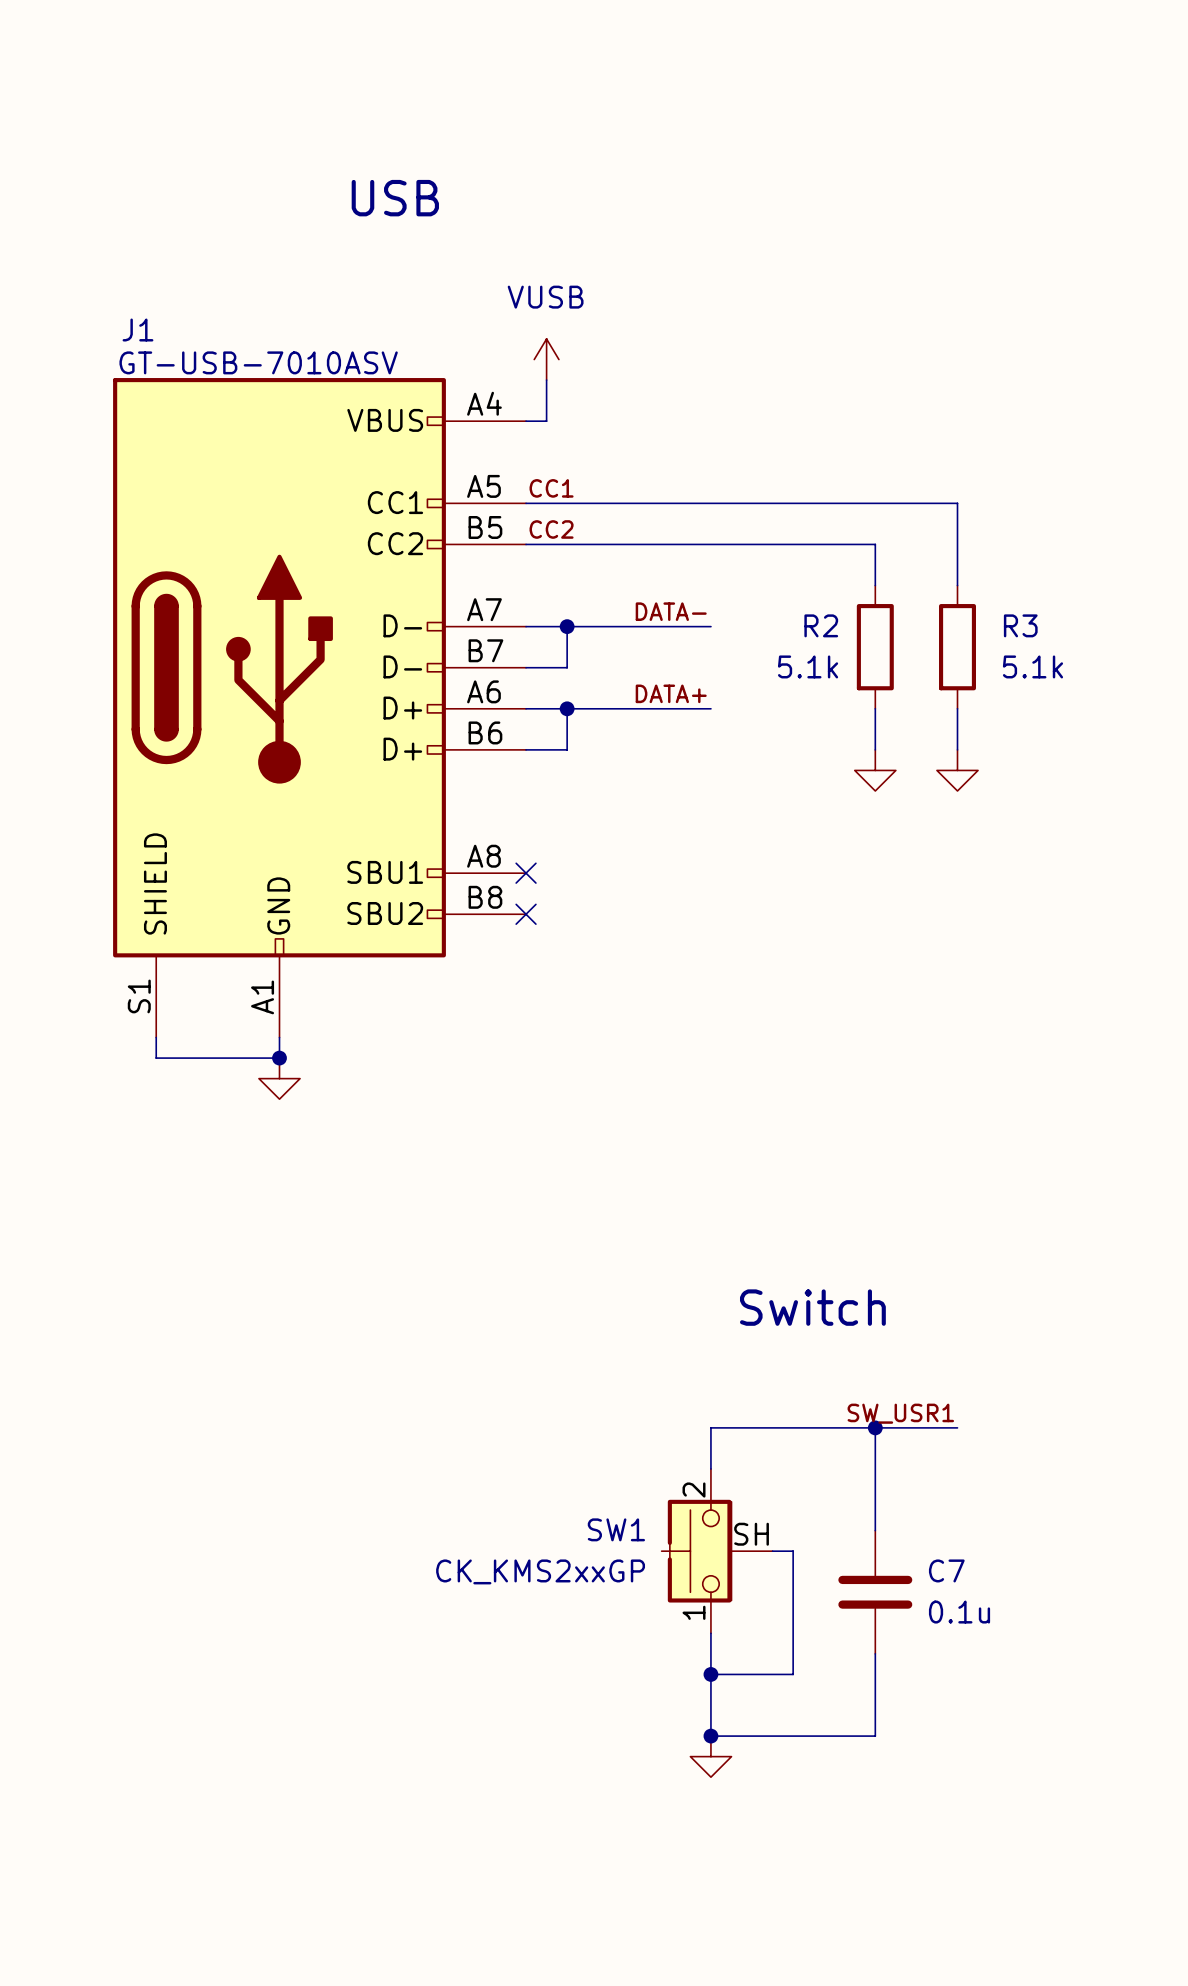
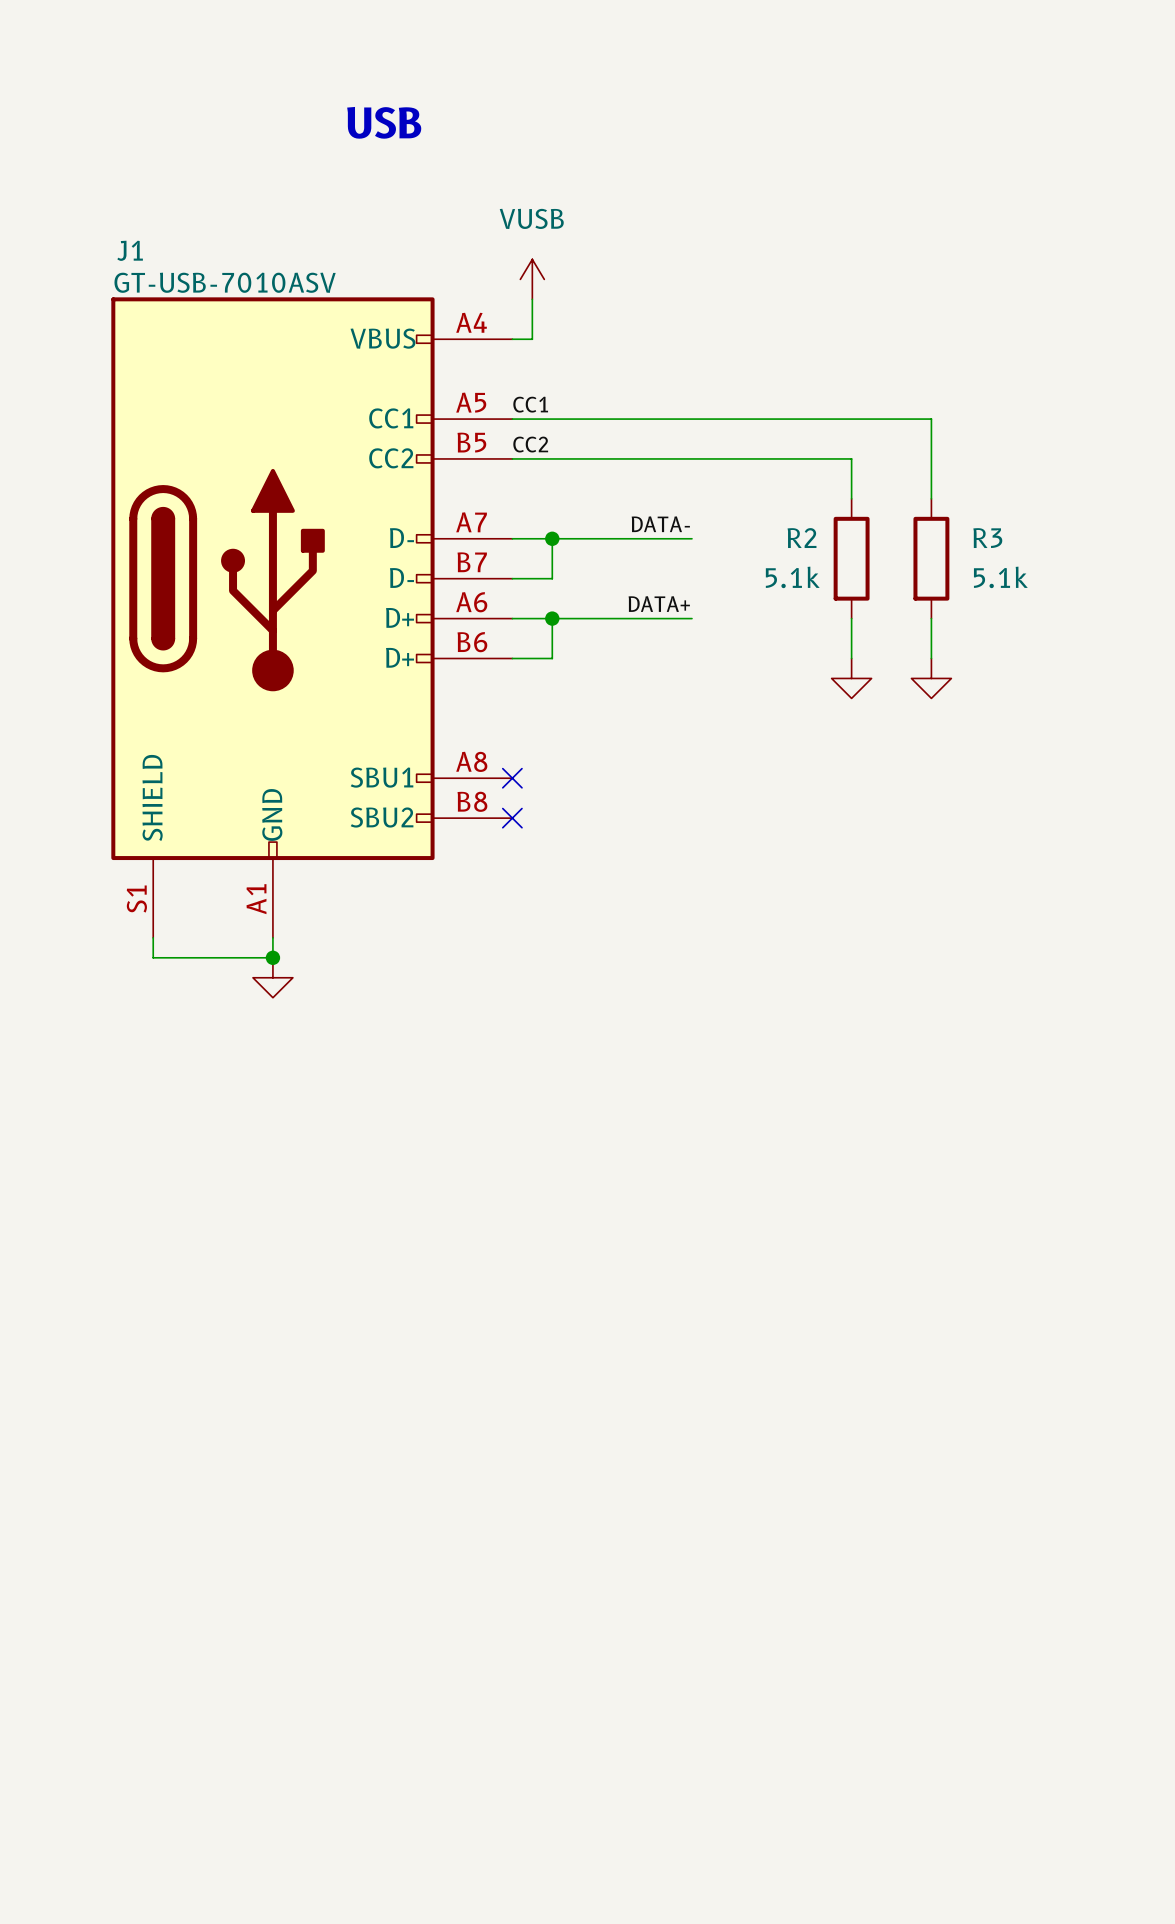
text: Switch (812, 1307) -> none
label: SW_USR1 (900, 1413) -> none
wire: (875, 1427) (875, 1530) -> none
junction: (875, 1427) -> none
wire: (957, 1427) (710, 1427) (710, 1468) -> none
SW1: CK_KMS2xxGP (717, 1551) -> none
wire: (772, 1551) (793, 1551) (793, 1674) (710, 1674) -> none
C7: 0.1u (875, 1592) -> none
wire: (710, 1633) (710, 1736) (875, 1736) (875, 1653) -> none
junction: (710, 1674) -> none
junction: (710, 1736) -> none
power symbol: (710, 1756) -> none

